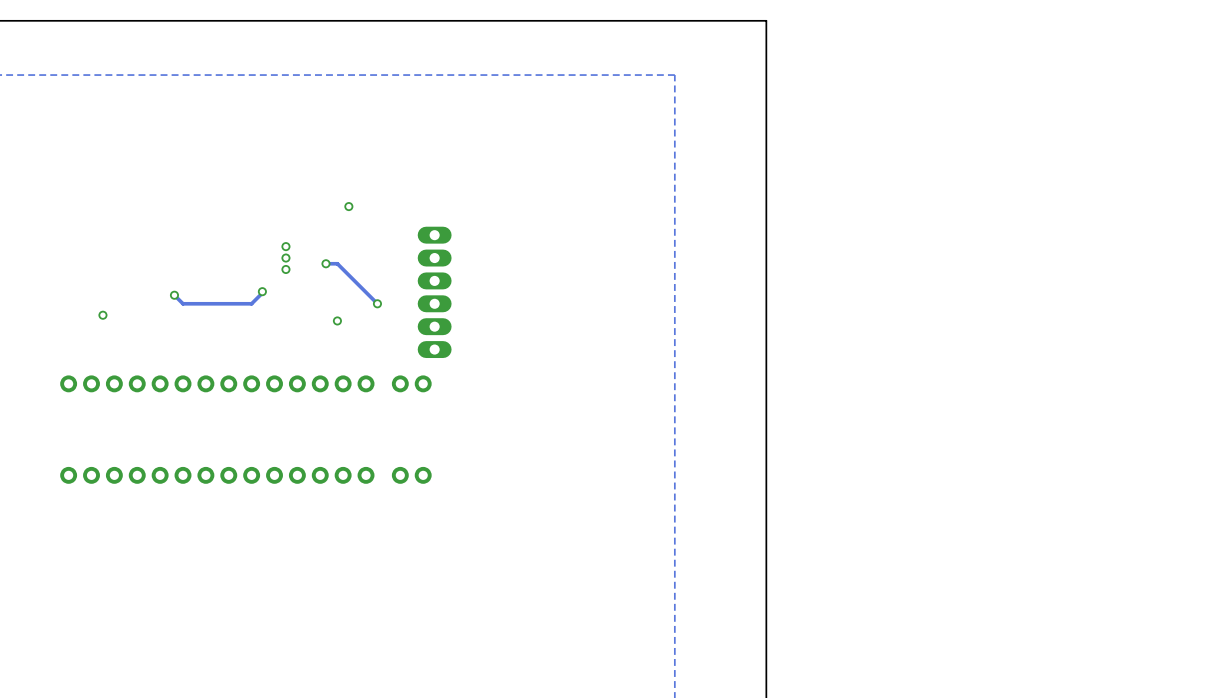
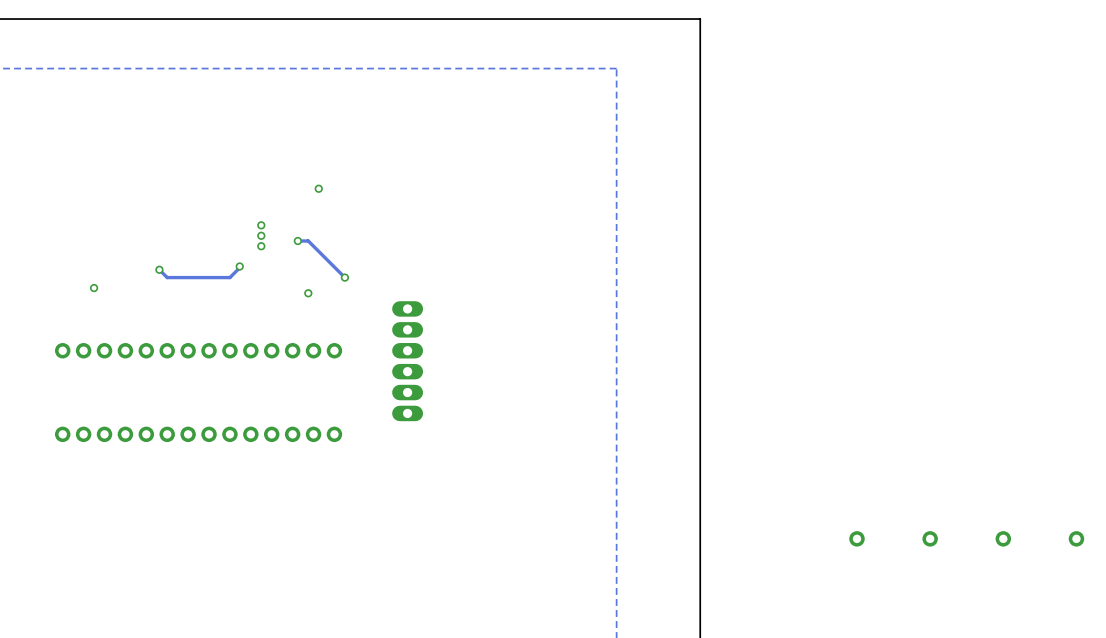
part position: (434, 292) -> (407, 361)
part: (400, 383) -> none
part: (423, 383) -> none
part: (400, 475) -> none
part: (423, 475) -> none
part: none -> (856, 538)
part: none -> (930, 538)
part: none -> (1003, 538)
part: none -> (1076, 538)

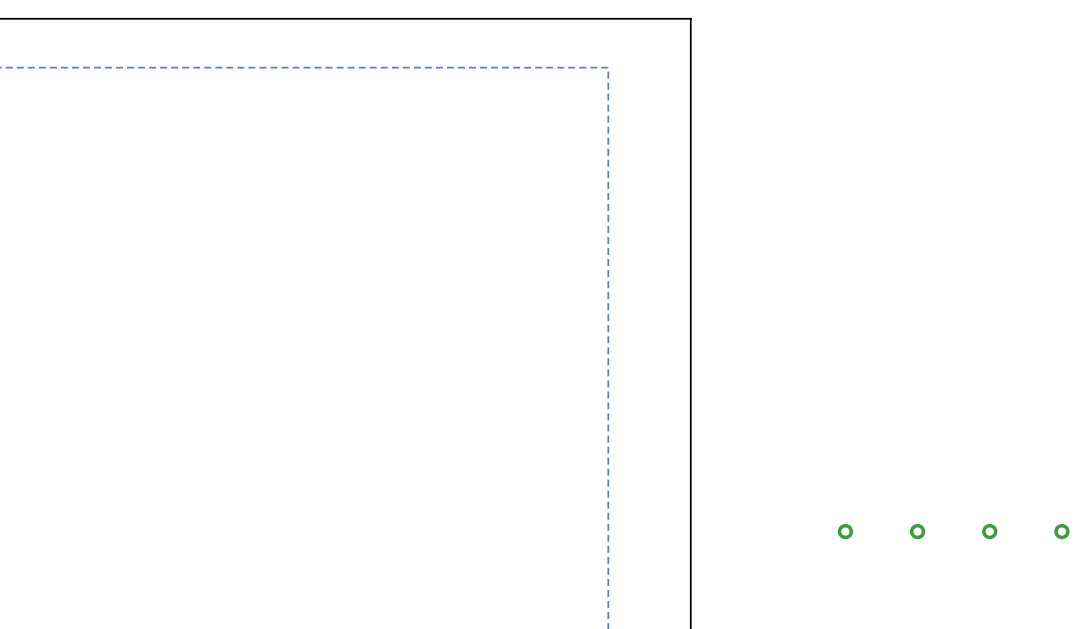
via: (318, 188) -> none
via: (261, 225) -> none
via: (261, 235) -> none
track: (297, 241) (308, 241) (344, 277) -> none
via: (297, 241) -> none
via: (261, 246) -> none
track: (239, 266) (229, 277) (167, 277) (159, 269) -> none
via: (239, 266) -> none
via: (159, 269) -> none
via: (344, 277) -> none
via: (94, 288) -> none
via: (308, 293) -> none
part: (198, 350) -> none
part: (407, 361) -> none
part: (198, 434) -> none

